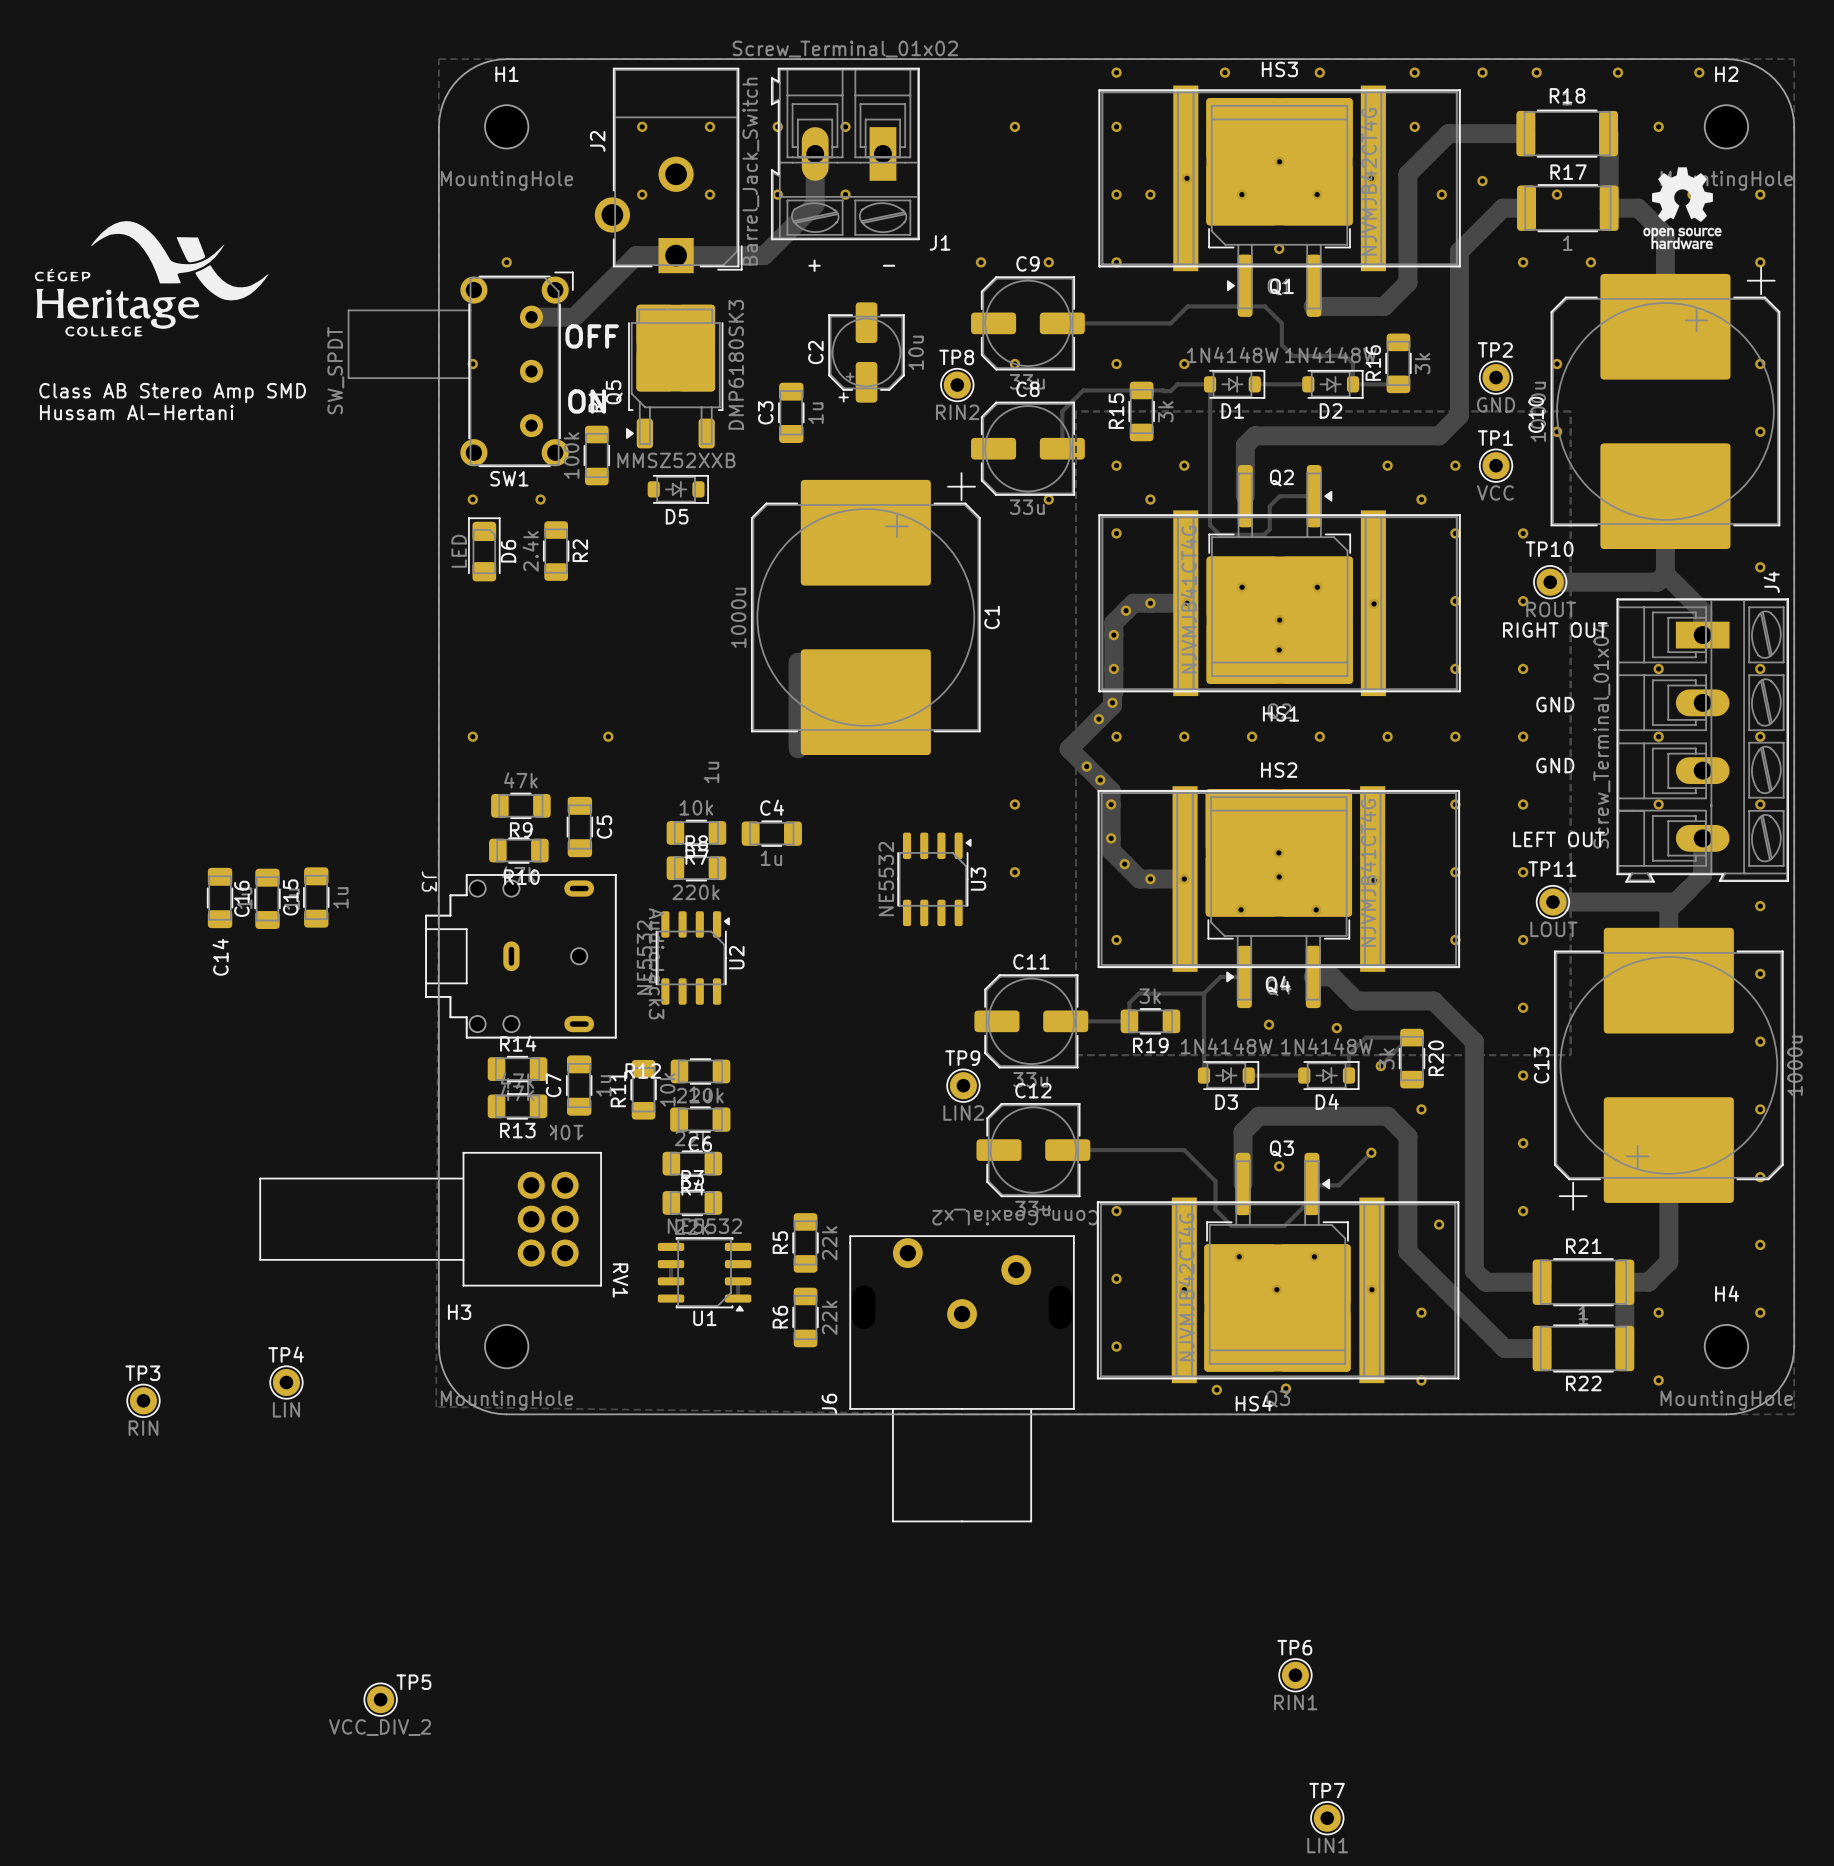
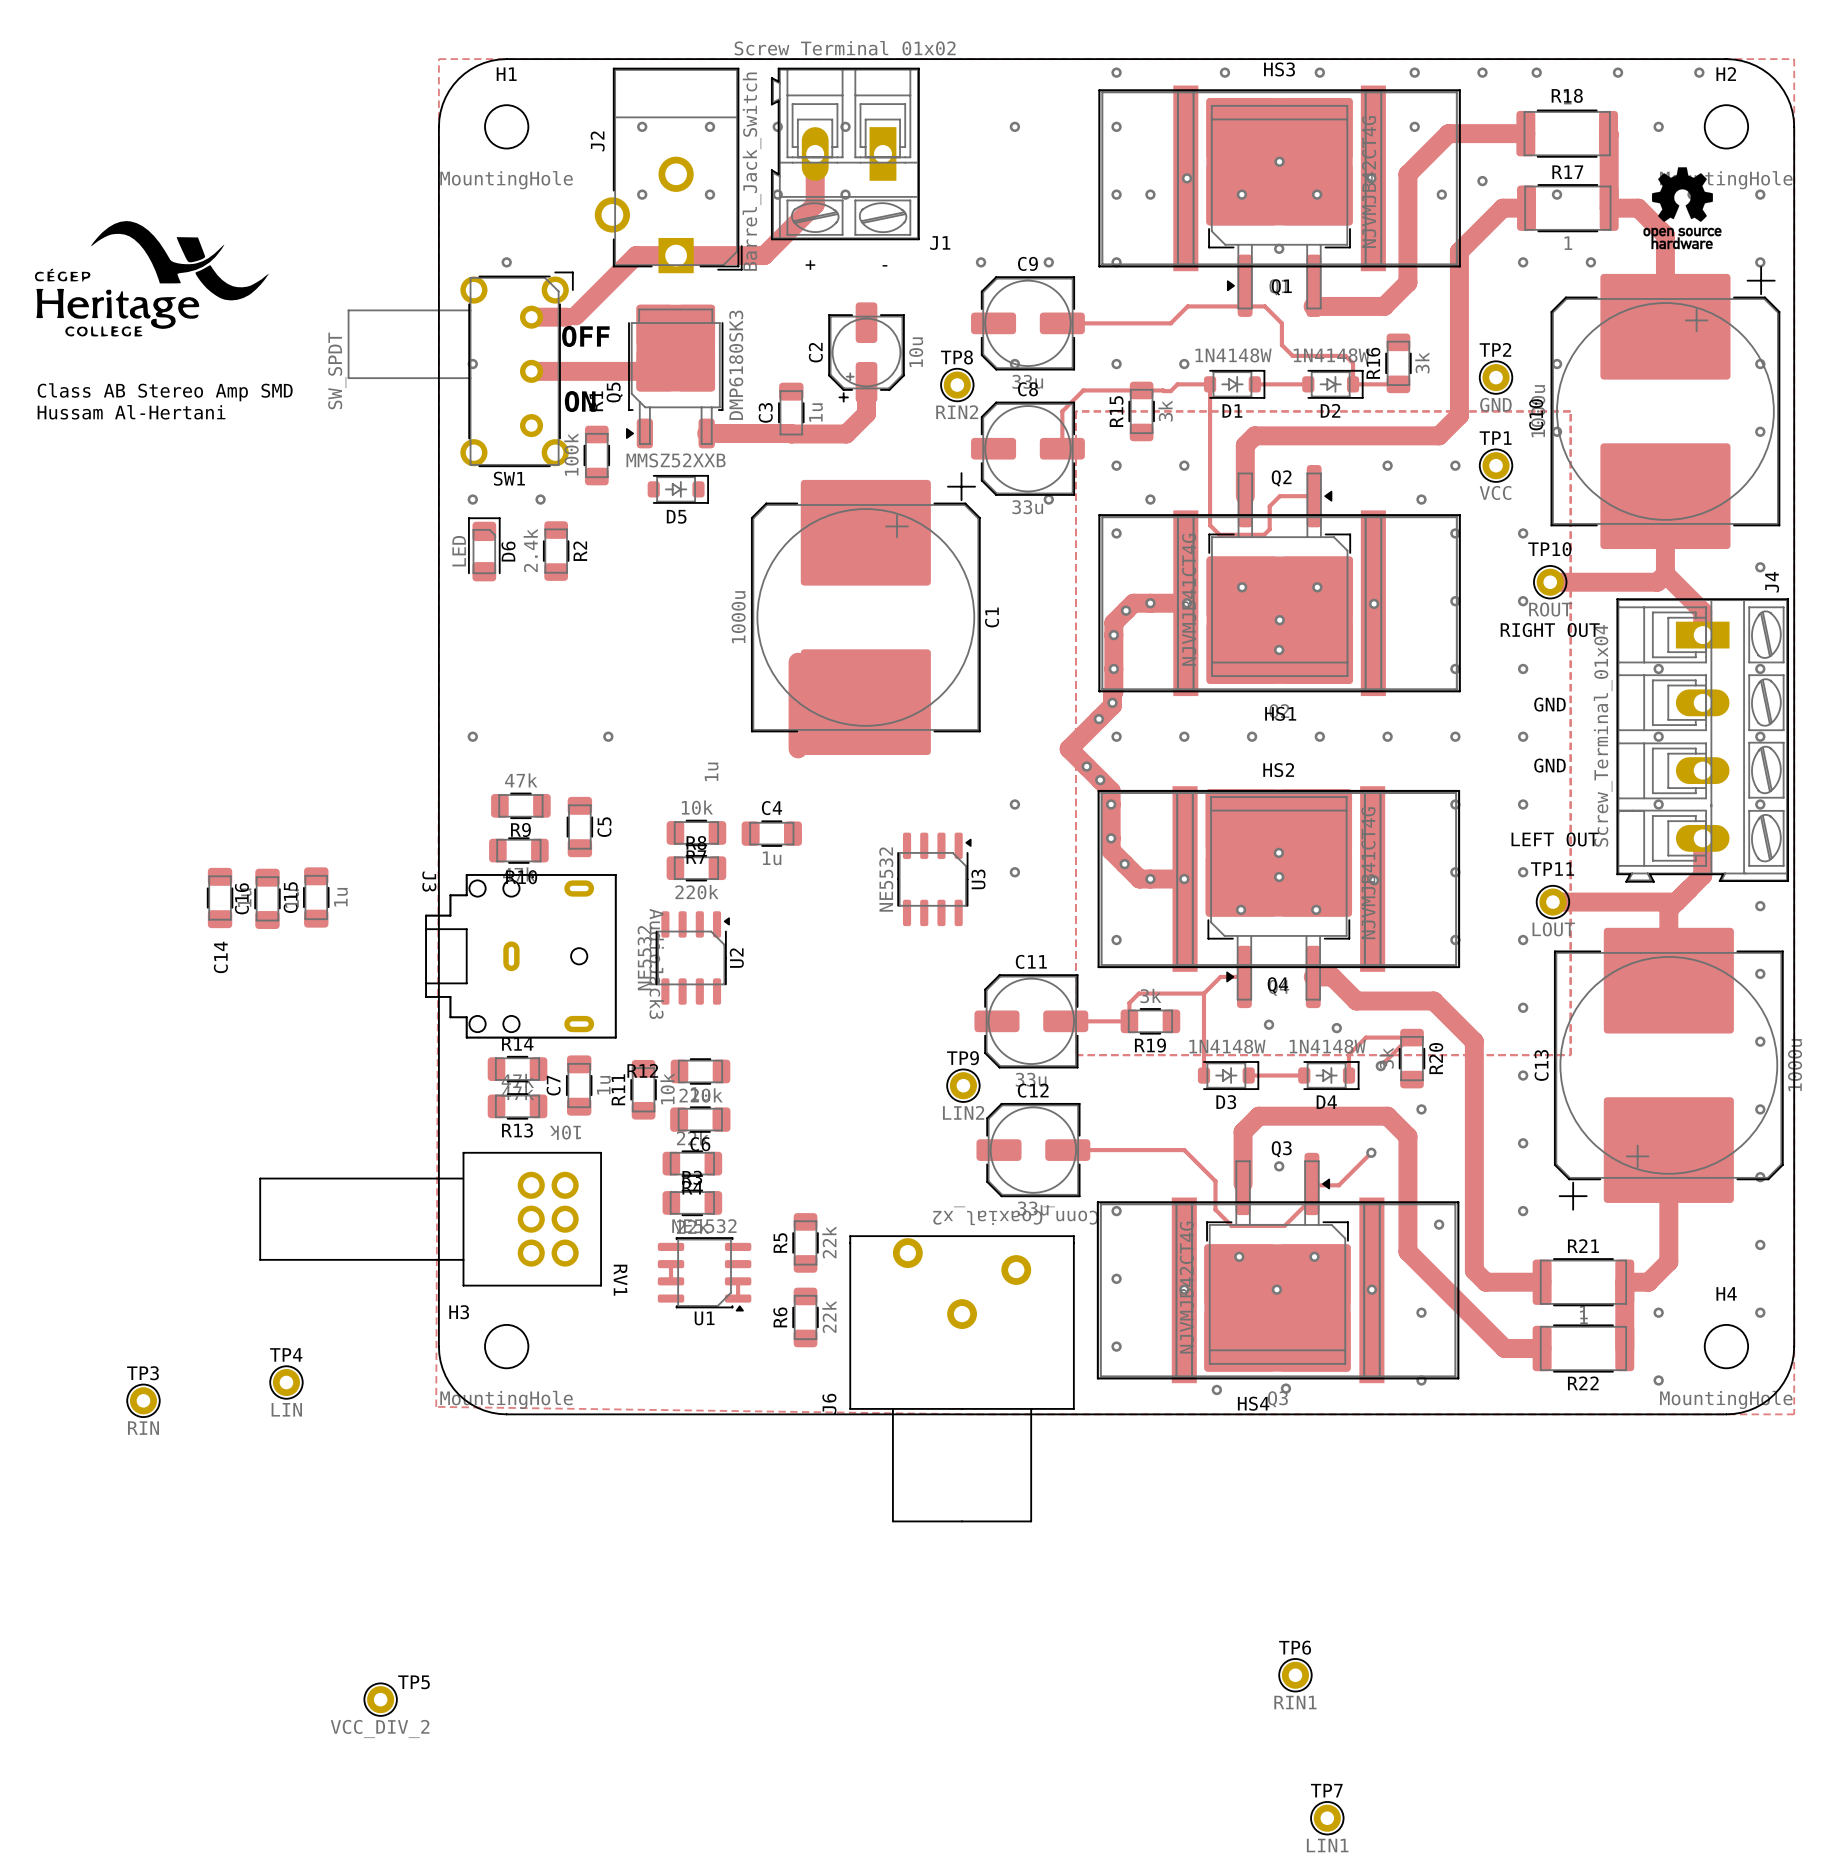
track: none -> (655, 370) (531, 371)
track: none -> (866, 382) (866, 413) (846, 433) (706, 433)

